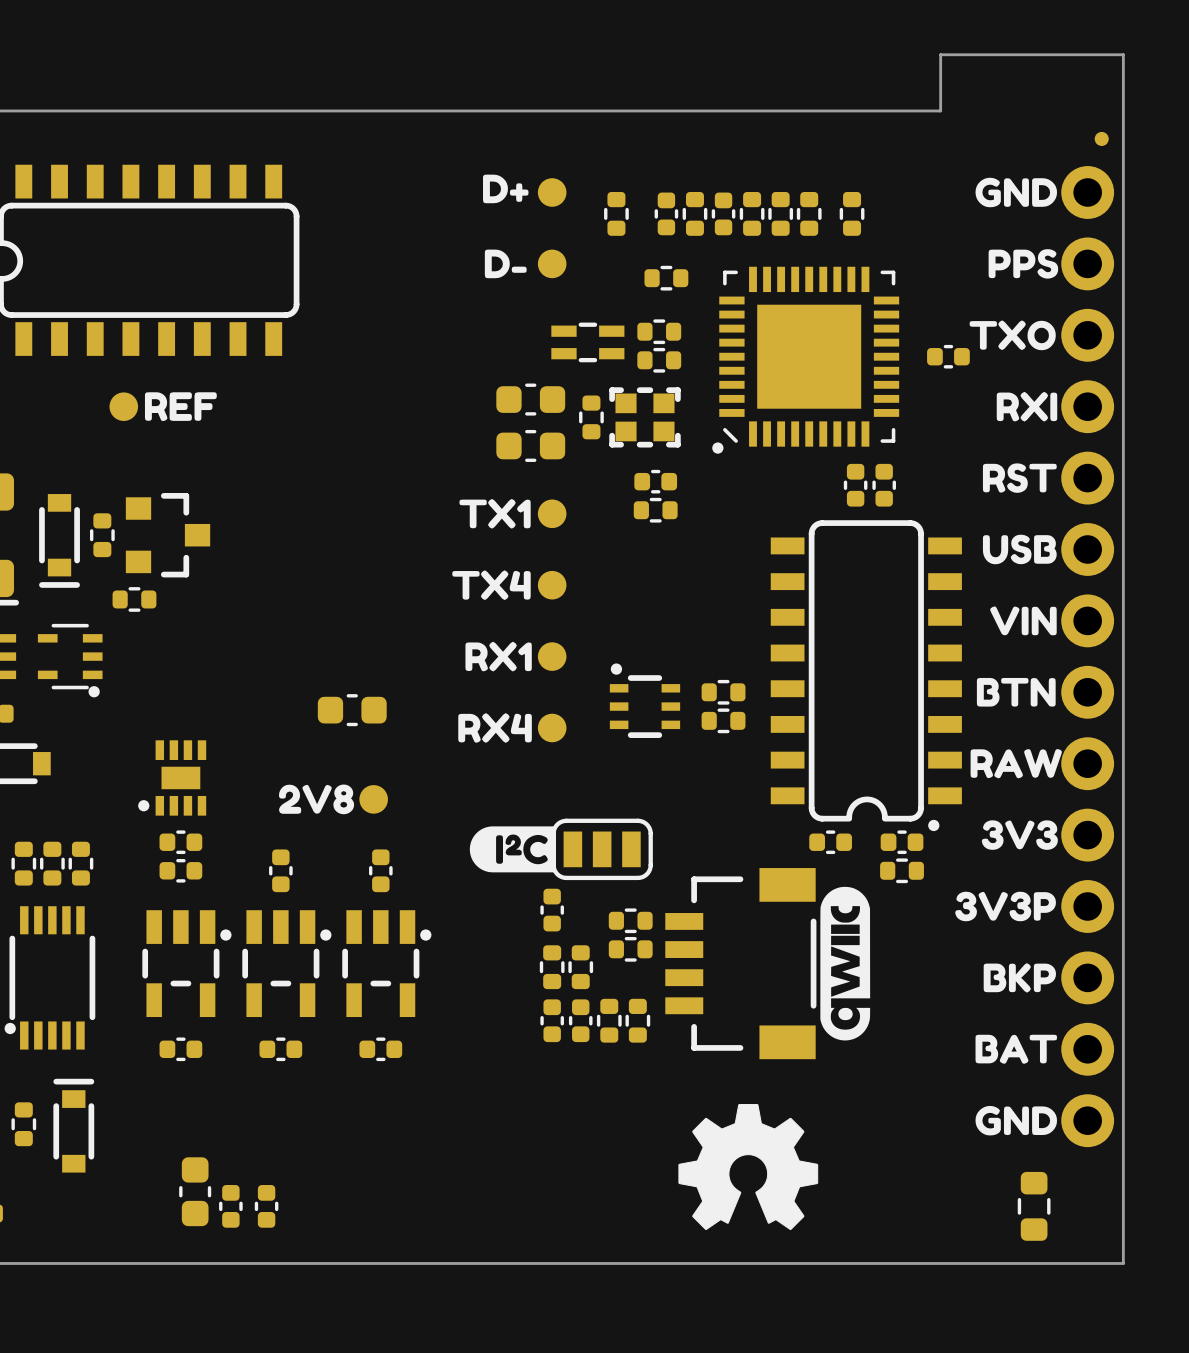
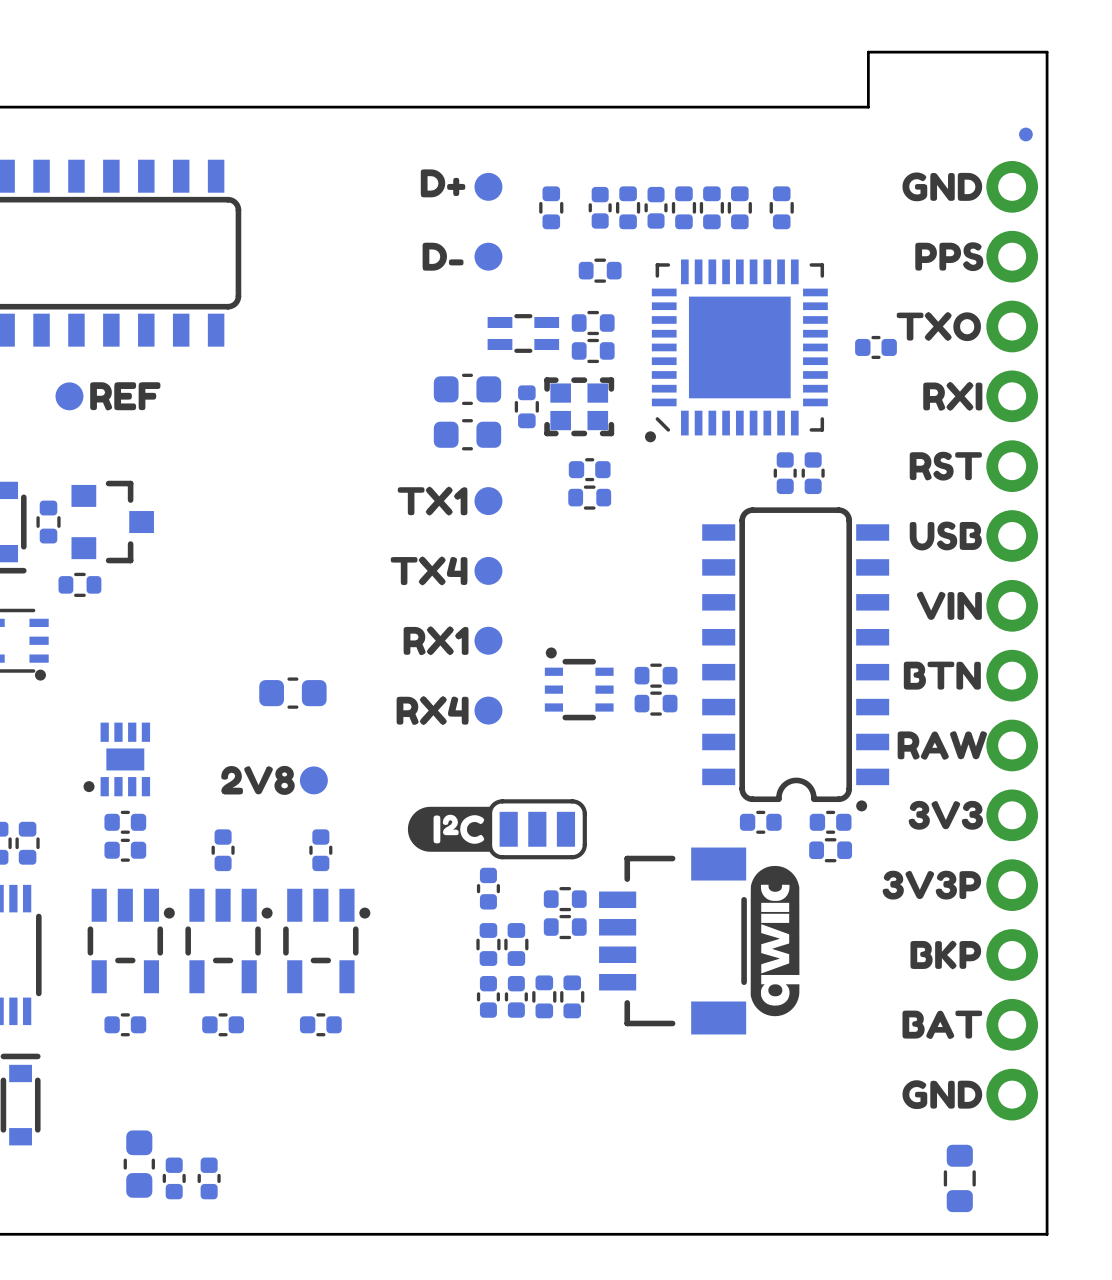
drawing: [678, 1104, 819, 1230] -> none

